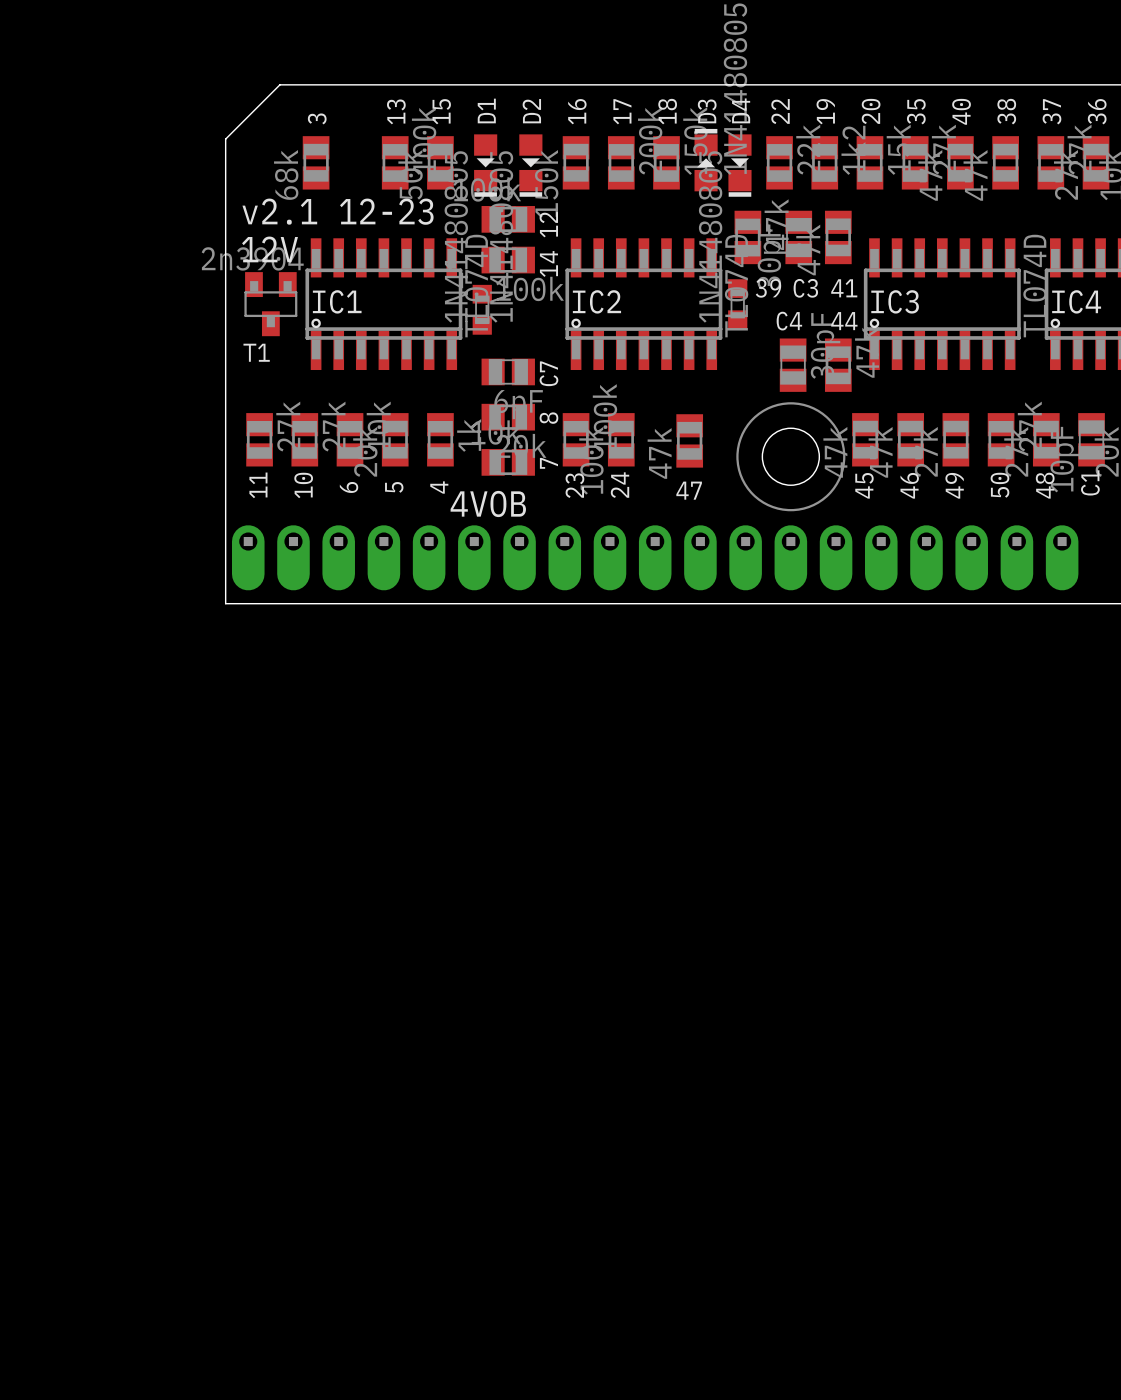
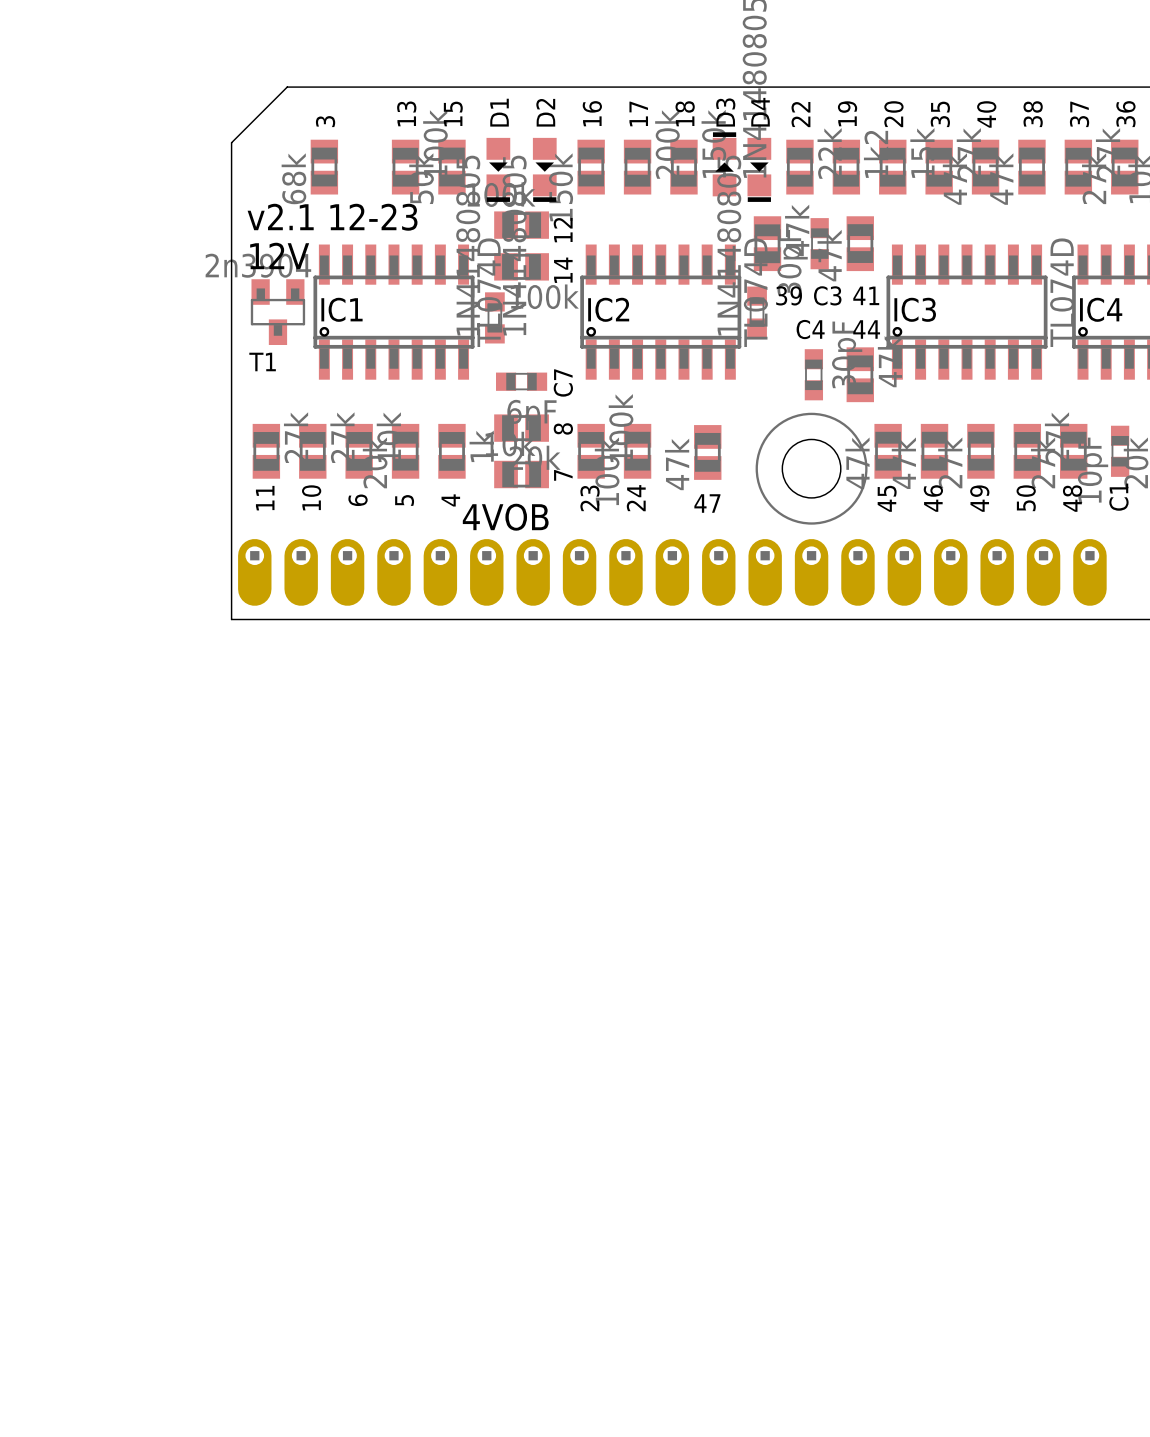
part footprint: [785, 210, 813, 265] -> [810, 218, 829, 270]
part footprint: [779, 338, 807, 392] -> [804, 349, 824, 401]
part footprint: [481, 358, 535, 386] -> [495, 372, 548, 391]
part footprint: [1078, 413, 1105, 467] -> [1110, 425, 1130, 477]

